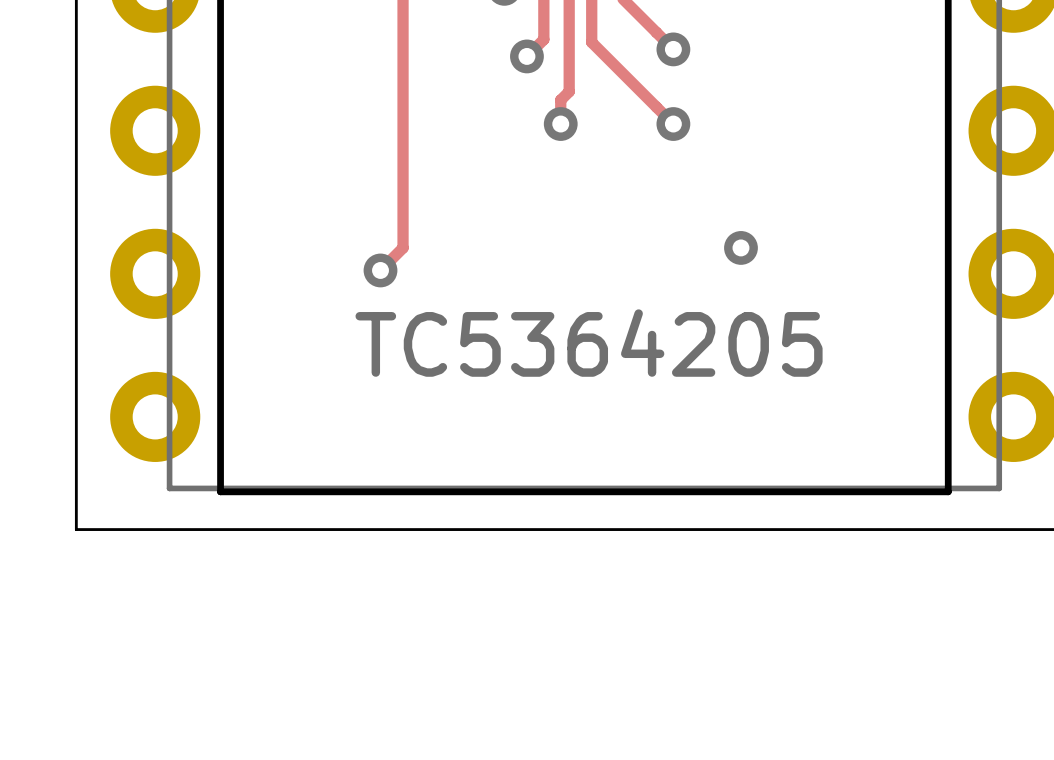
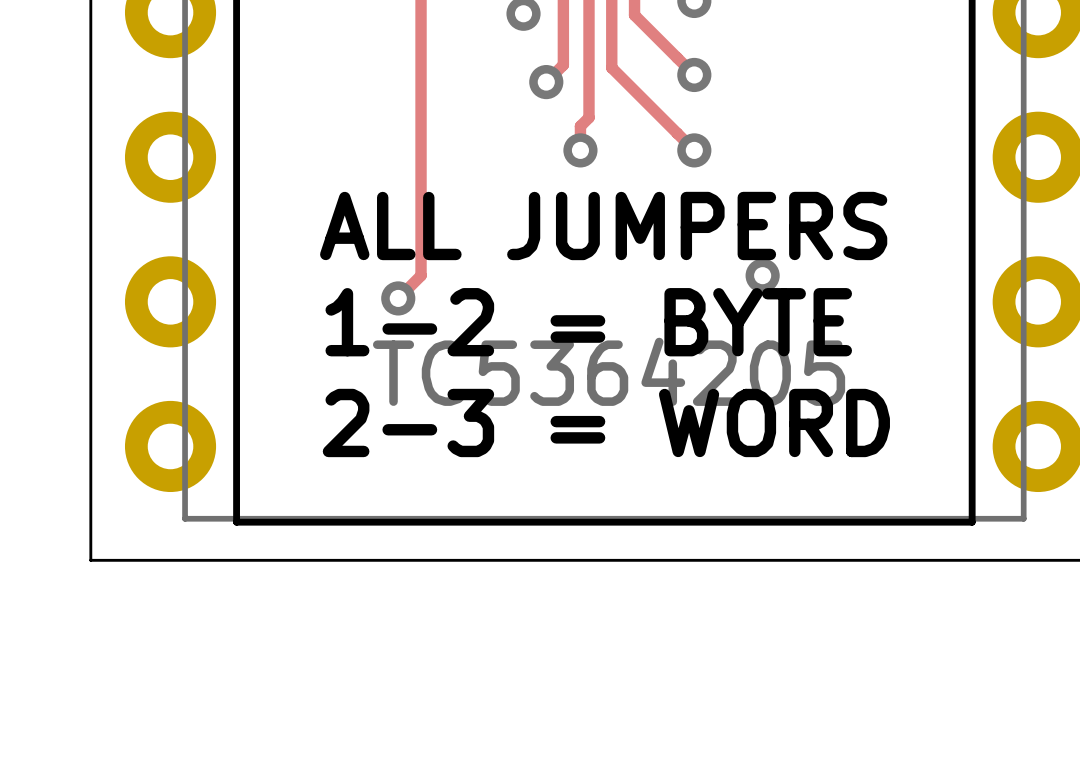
text: none -> ALL JUMPERS (603, 225)
text: none -> 1-2 = BYTE (588, 322)
text: none -> 2-3 = WORD (606, 422)

